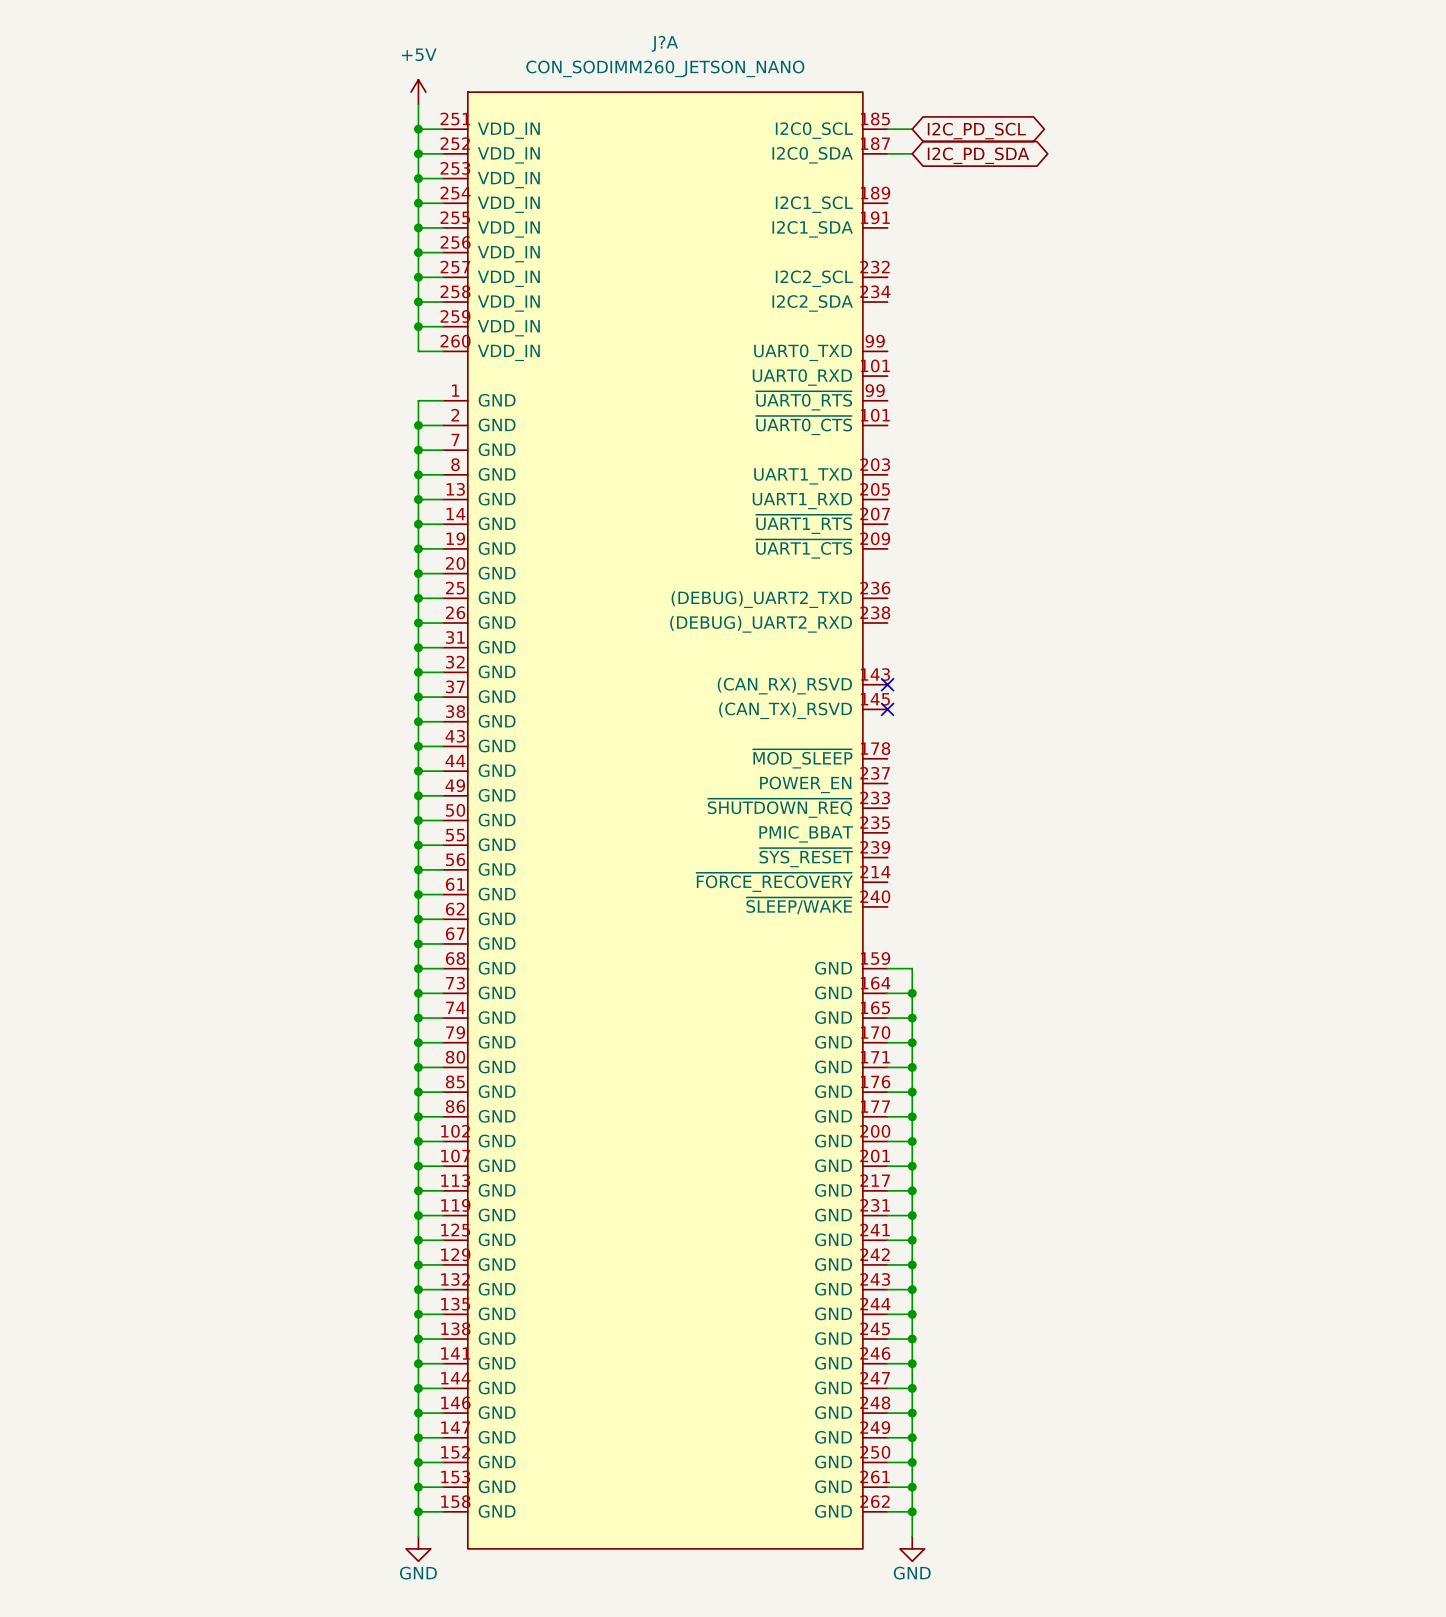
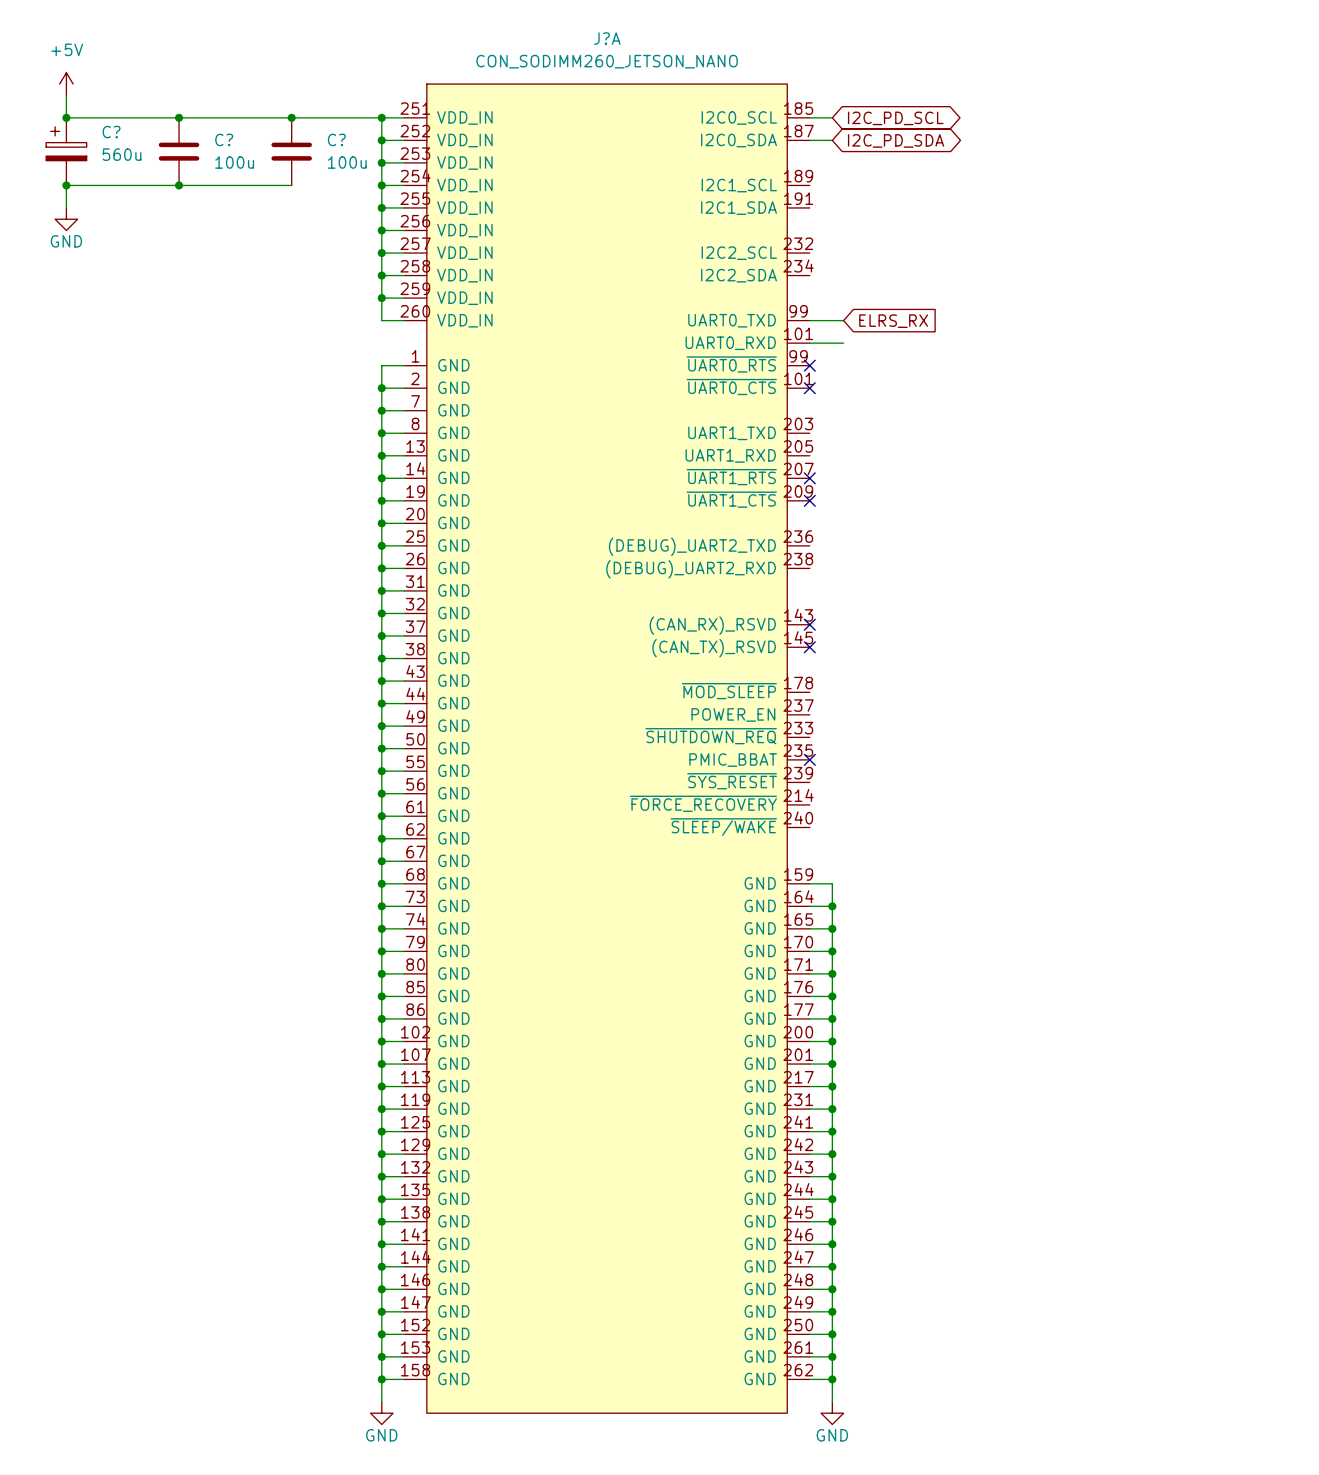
power symbol: none -> +5V (66, 84)
power symbol: +5V (418, 92) -> none
wire: (418, 104) (418, 129) -> (66, 95) (66, 117) (381, 117)
junction: none -> (66, 117)
junction: none -> (179, 117)
junction: none -> (291, 117)
C?: none -> 560u (66, 151)
C?: none -> 100u (179, 151)
C?: none -> 100u (291, 151)
junction: none -> (66, 185)
junction: none -> (179, 185)
wire: none -> (291, 185) (66, 185) (66, 207)
power symbol: none -> GND (66, 219)
wire: none -> (809, 320) (843, 320)
global label: none -> ELRS_RX (893, 321)
wire: none -> (809, 343) (843, 343)
no-connect mark: none -> (809, 365)
no-connect mark: none -> (809, 388)
no-connect mark: none -> (809, 478)
no-connect mark: none -> (809, 500)
no-connect mark: none -> (809, 759)

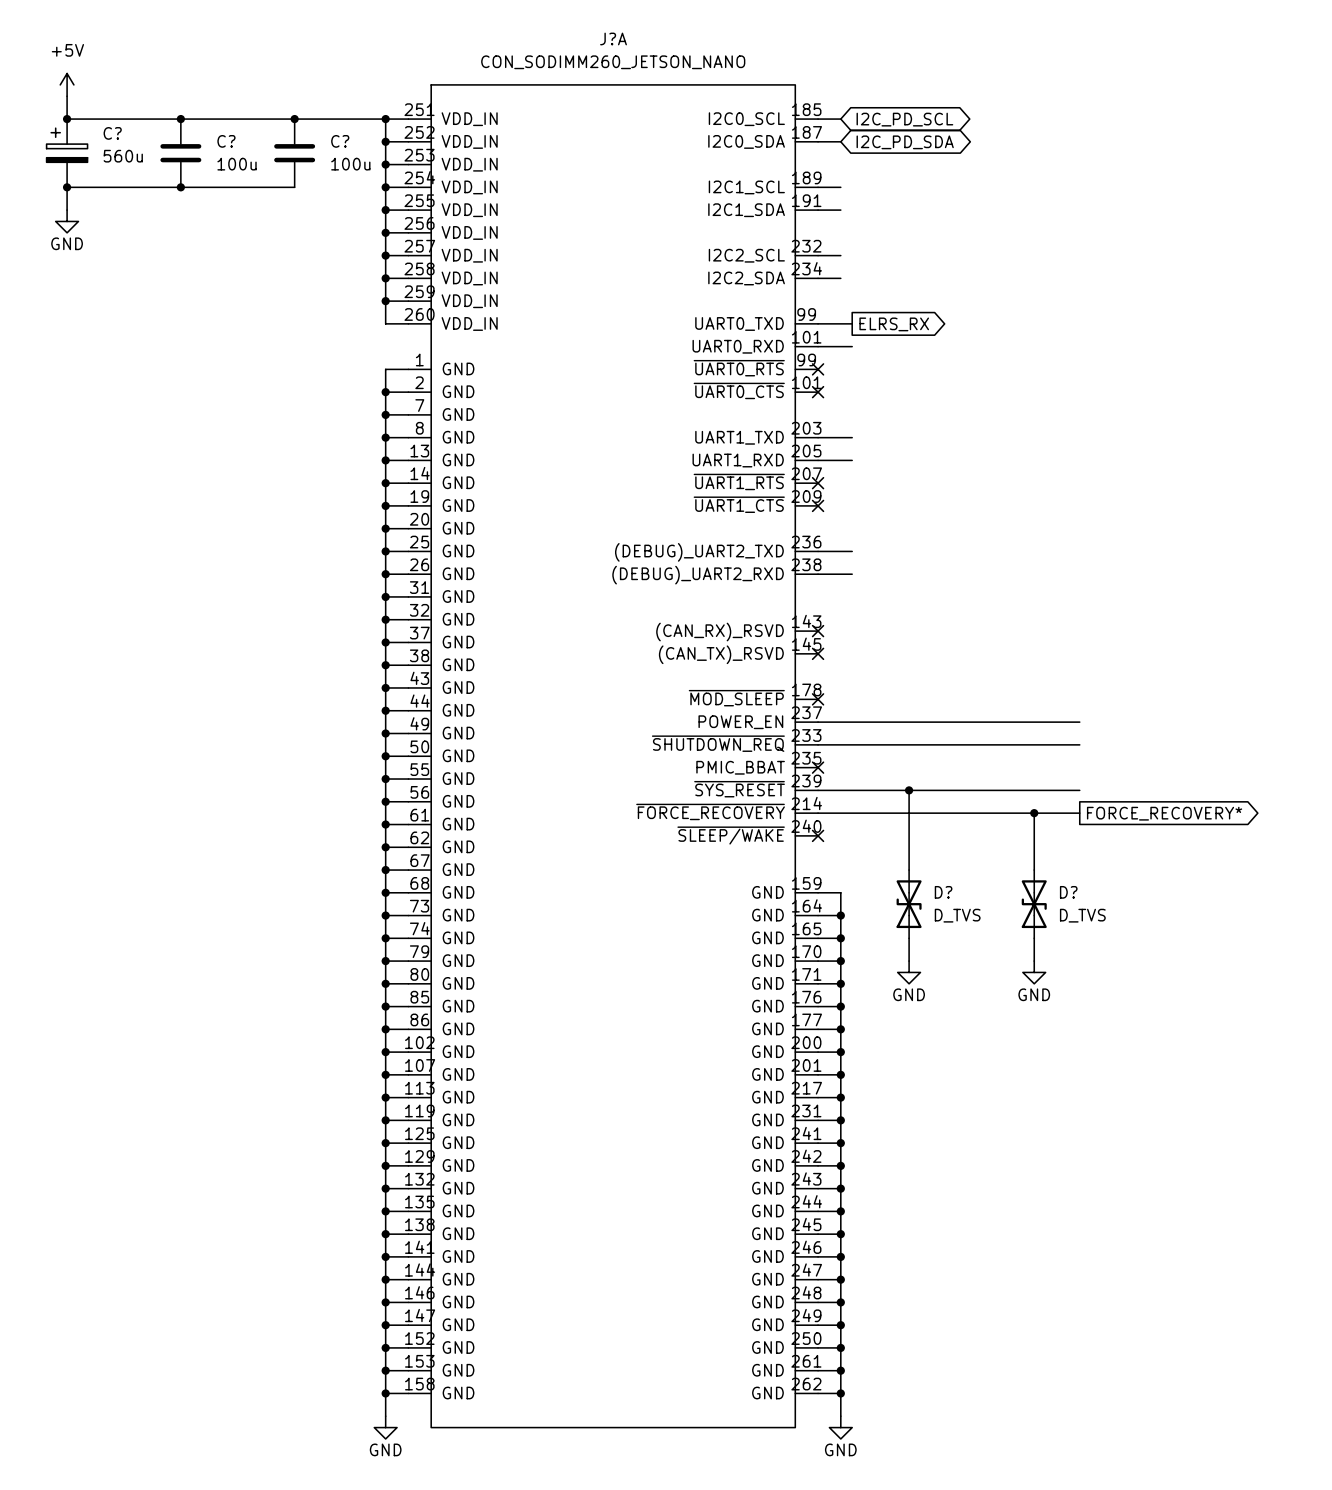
wire: none -> (818, 187) (840, 187)
wire: none -> (818, 210) (840, 210)
wire: none -> (818, 255) (840, 255)
wire: none -> (818, 278) (840, 278)
global label shape: input (893, 321) -> output (894, 324)
wire: none -> (818, 437) (852, 437)
wire: none -> (818, 460) (852, 460)
wire: none -> (818, 551) (852, 551)
wire: none -> (818, 574) (852, 574)
no-connect mark: none -> (818, 699)
wire: none -> (818, 722) (1079, 722)
wire: none -> (818, 744) (1079, 744)
wire: none -> (818, 790) (1079, 790)
wire: none -> (909, 790) (909, 870)
junction: none -> (909, 790)
wire: none -> (818, 813) (1079, 813)
wire: none -> (1034, 813) (1034, 870)
junction: none -> (1034, 813)
global label: none -> FORCE_RECOVERY* (1164, 813)
no-connect mark: none -> (818, 835)
D?: none -> D_TVS (909, 904)
D?: none -> D_TVS (1034, 904)
wire: none -> (909, 938) (909, 961)
wire: none -> (1034, 938) (1034, 961)
power symbol: none -> GND (909, 972)
power symbol: none -> GND (1034, 972)

